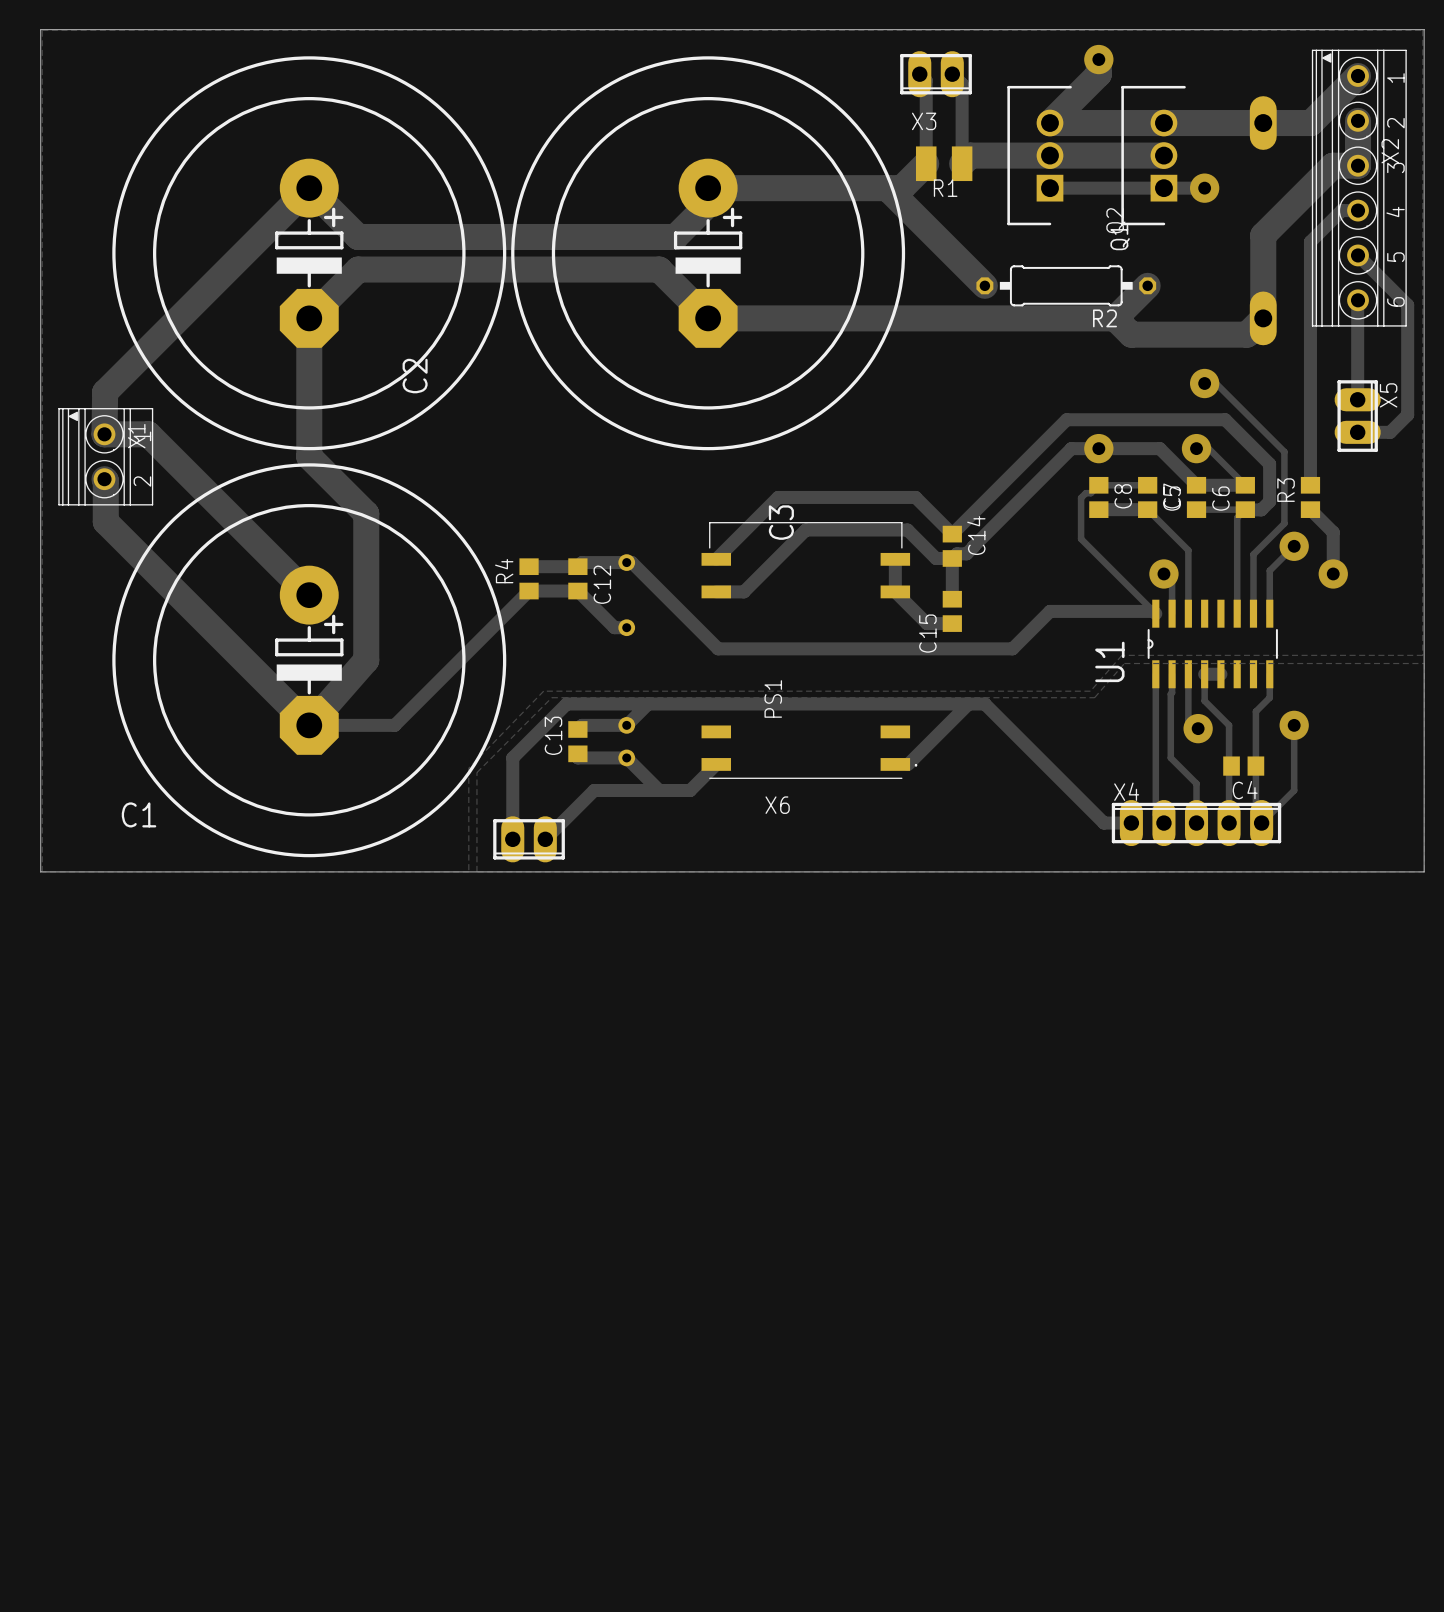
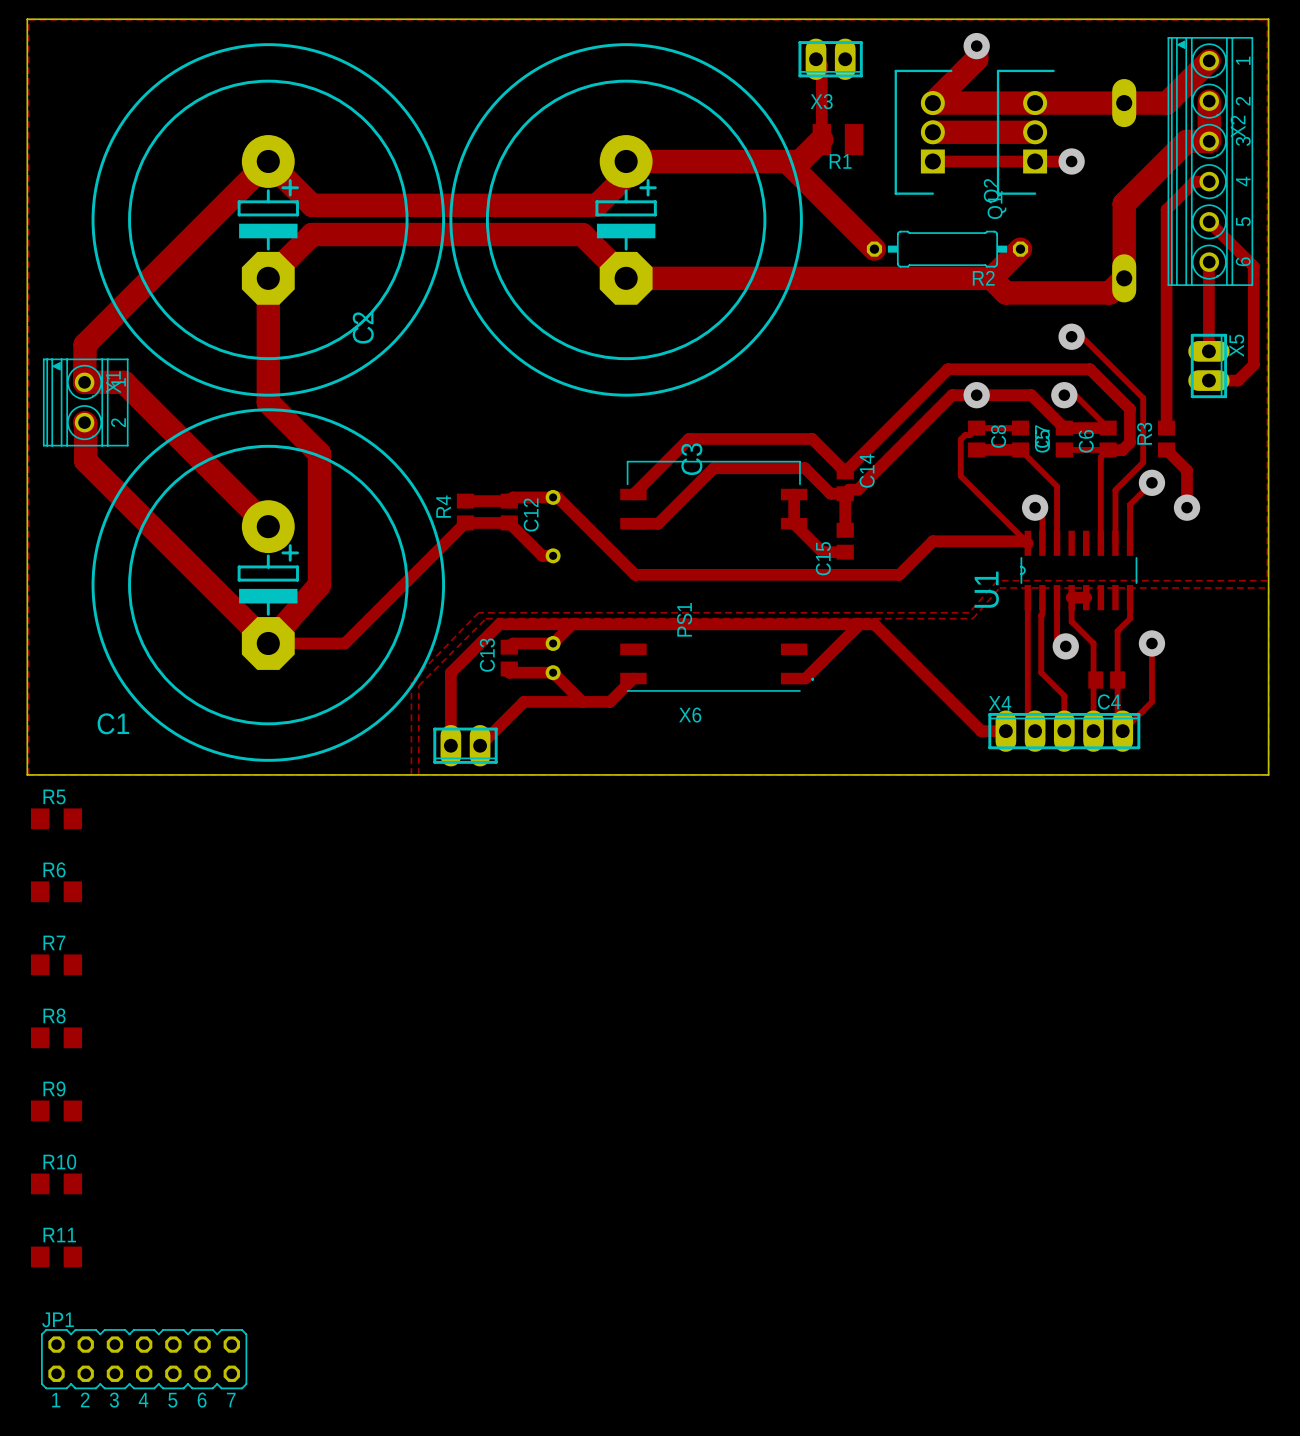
track: (952, 74) (962, 84) (962, 163) (970, 155) (1049, 155) -> none
R5: none -> (56, 818)
R6: none -> (56, 891)
R7: none -> (56, 964)
R8: none -> (56, 1037)
R9: none -> (56, 1110)
R10: none -> (56, 1183)
R11: none -> (56, 1256)
JP1: none -> (144, 1359)

